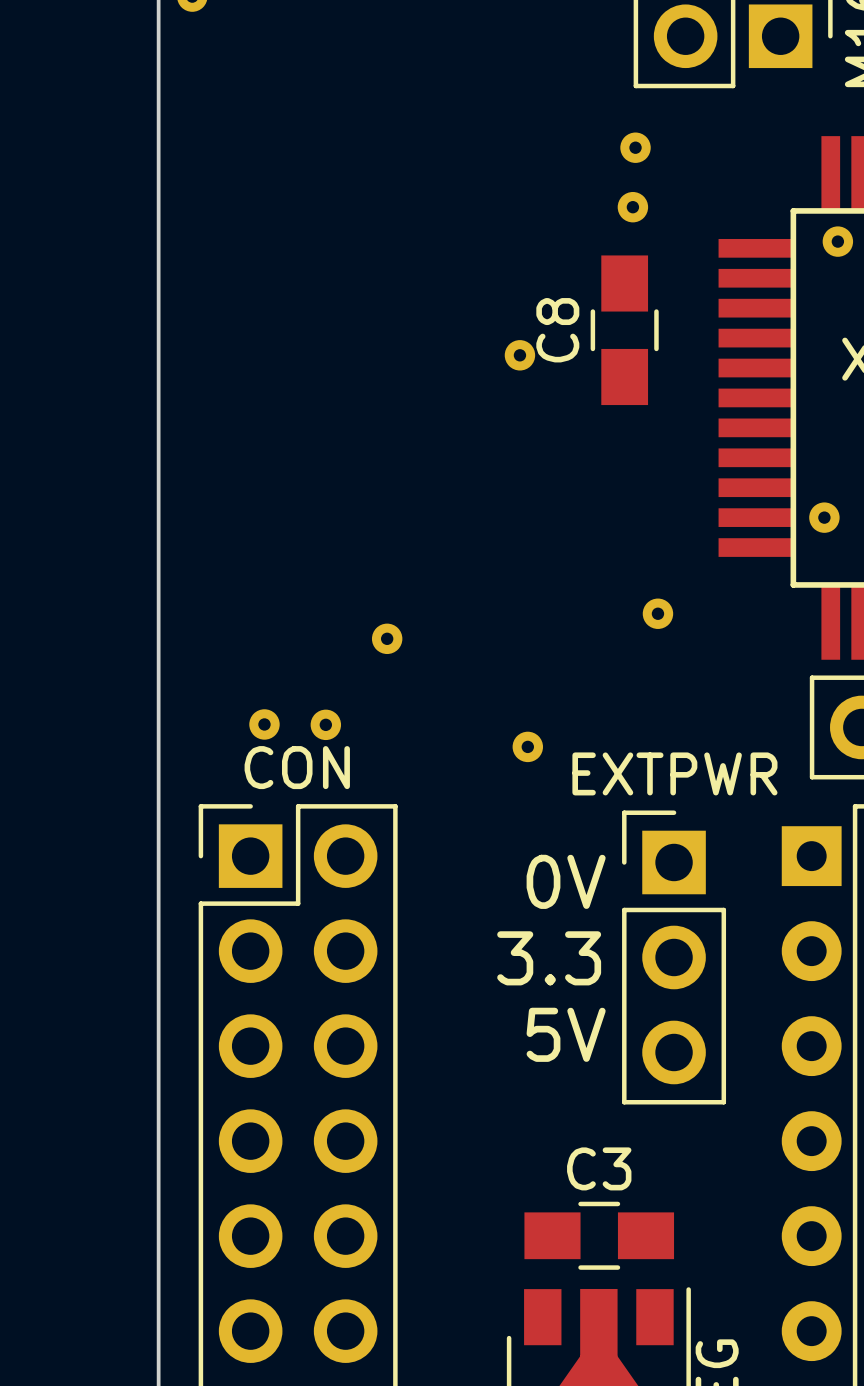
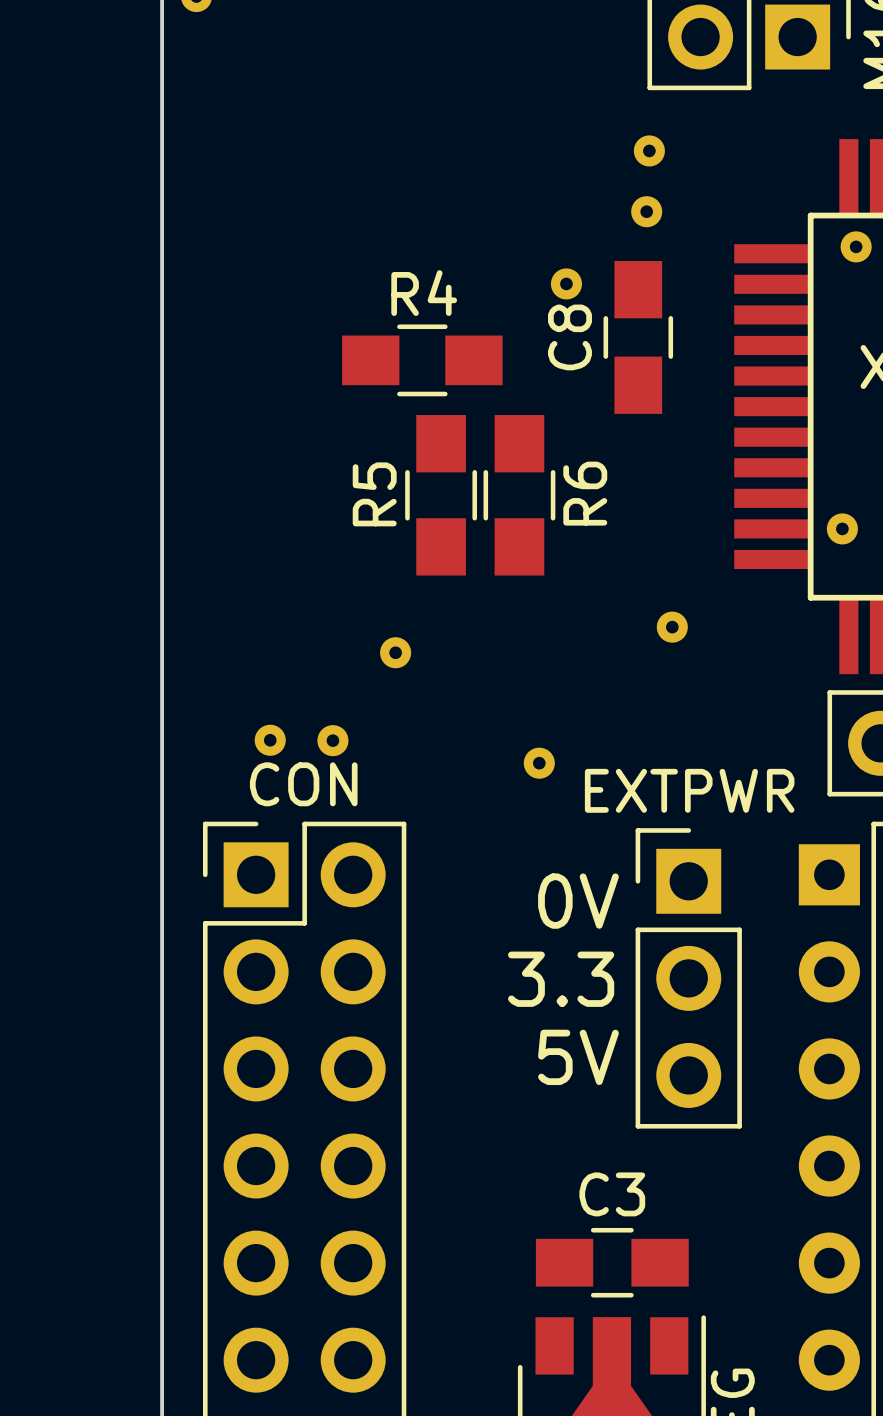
R4: none -> (422, 360)
part position: (519, 355) -> (566, 283)
R5: none -> (441, 495)
R6: none -> (519, 495)

